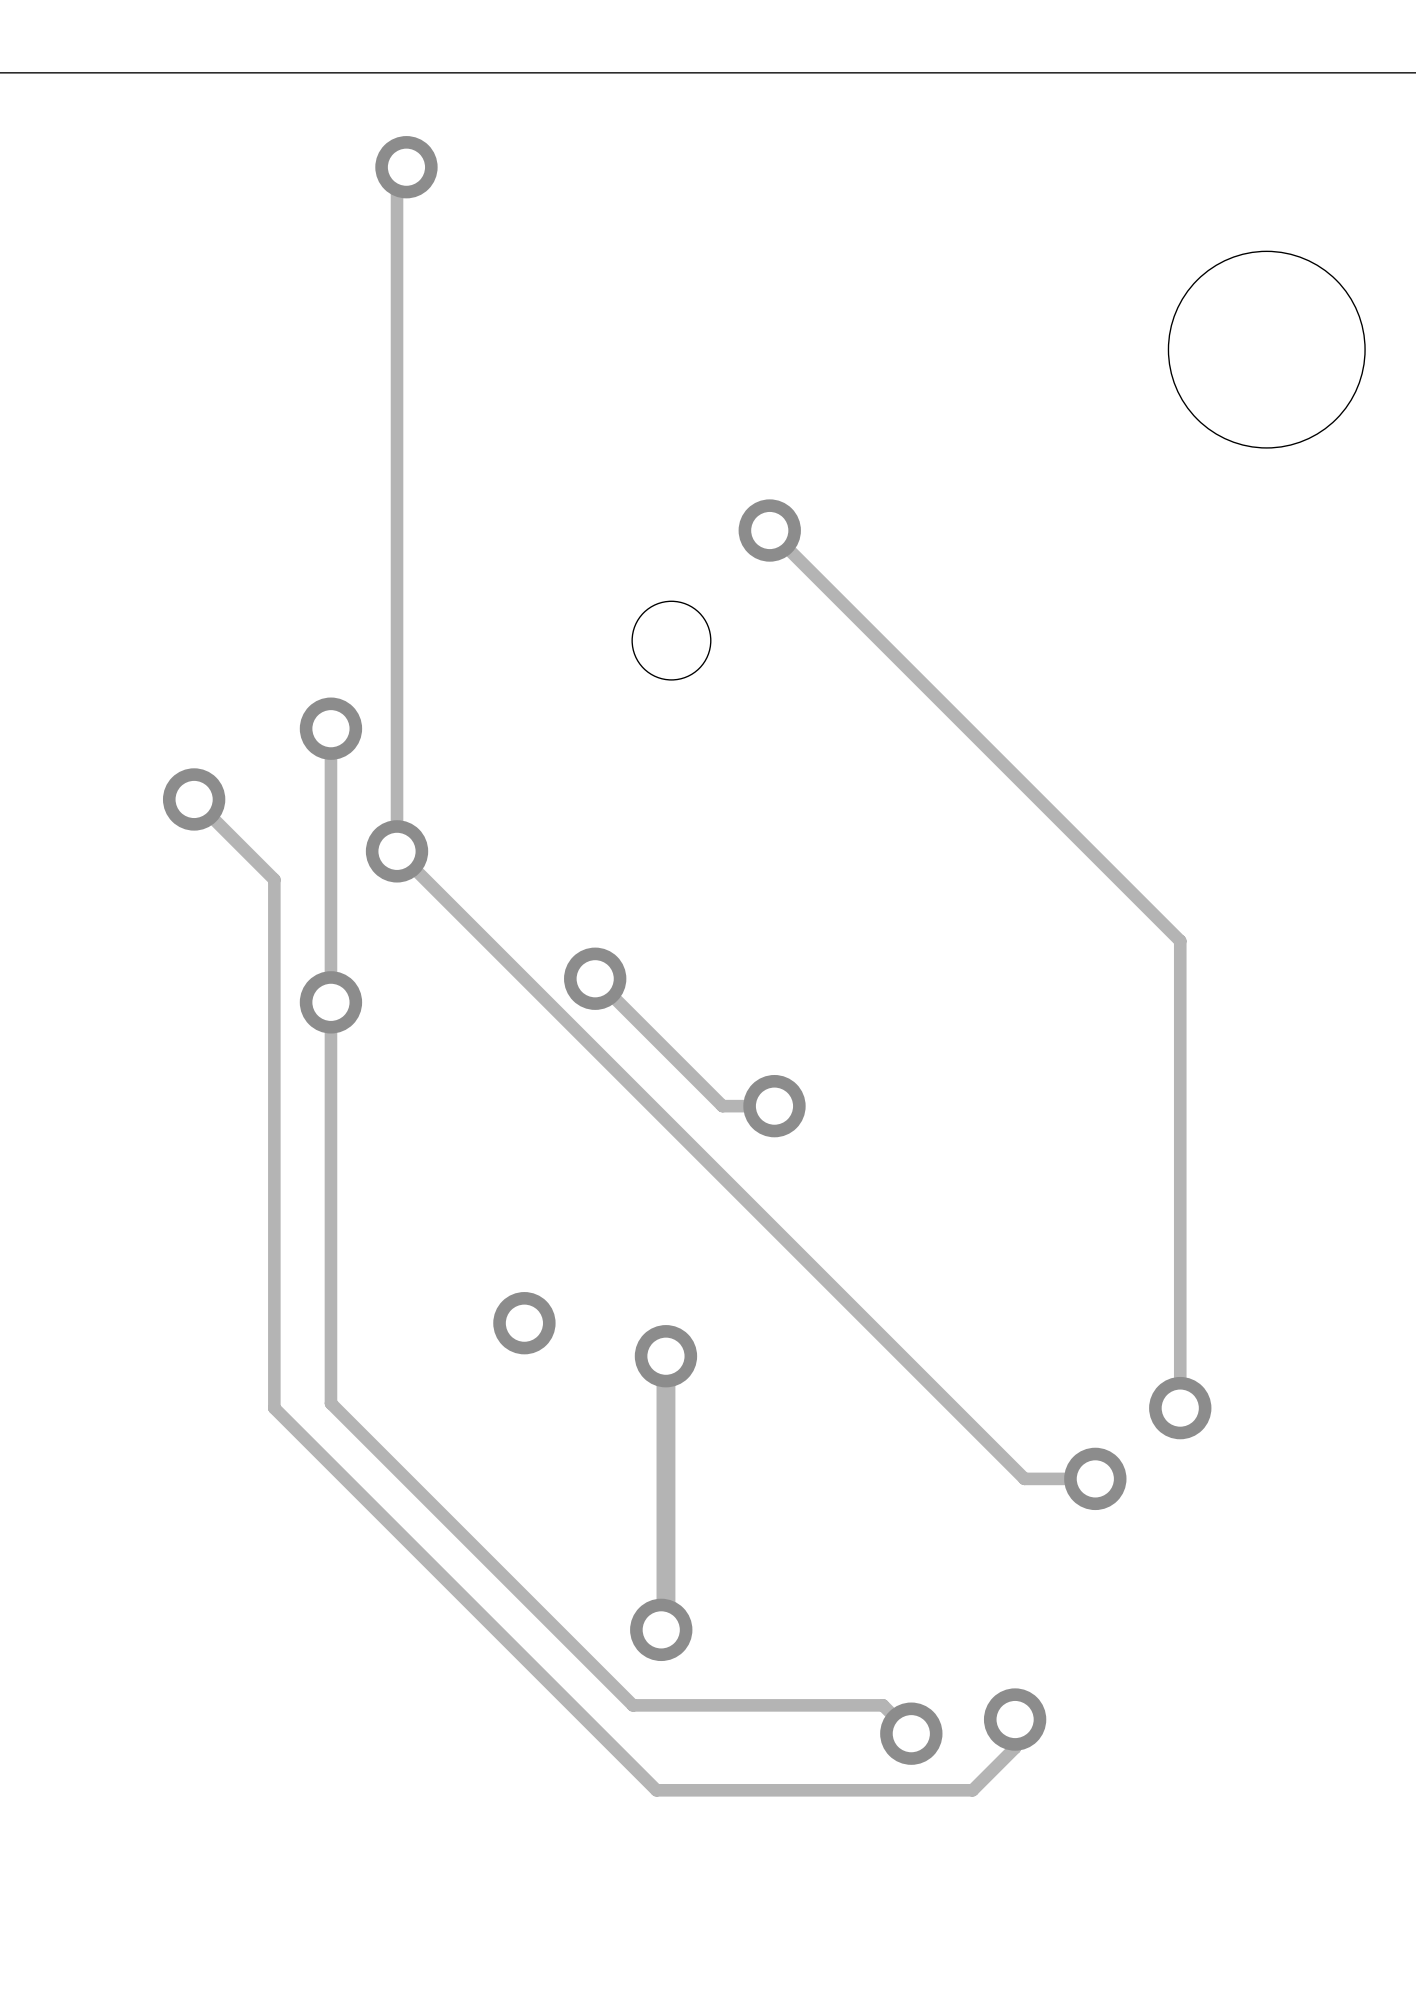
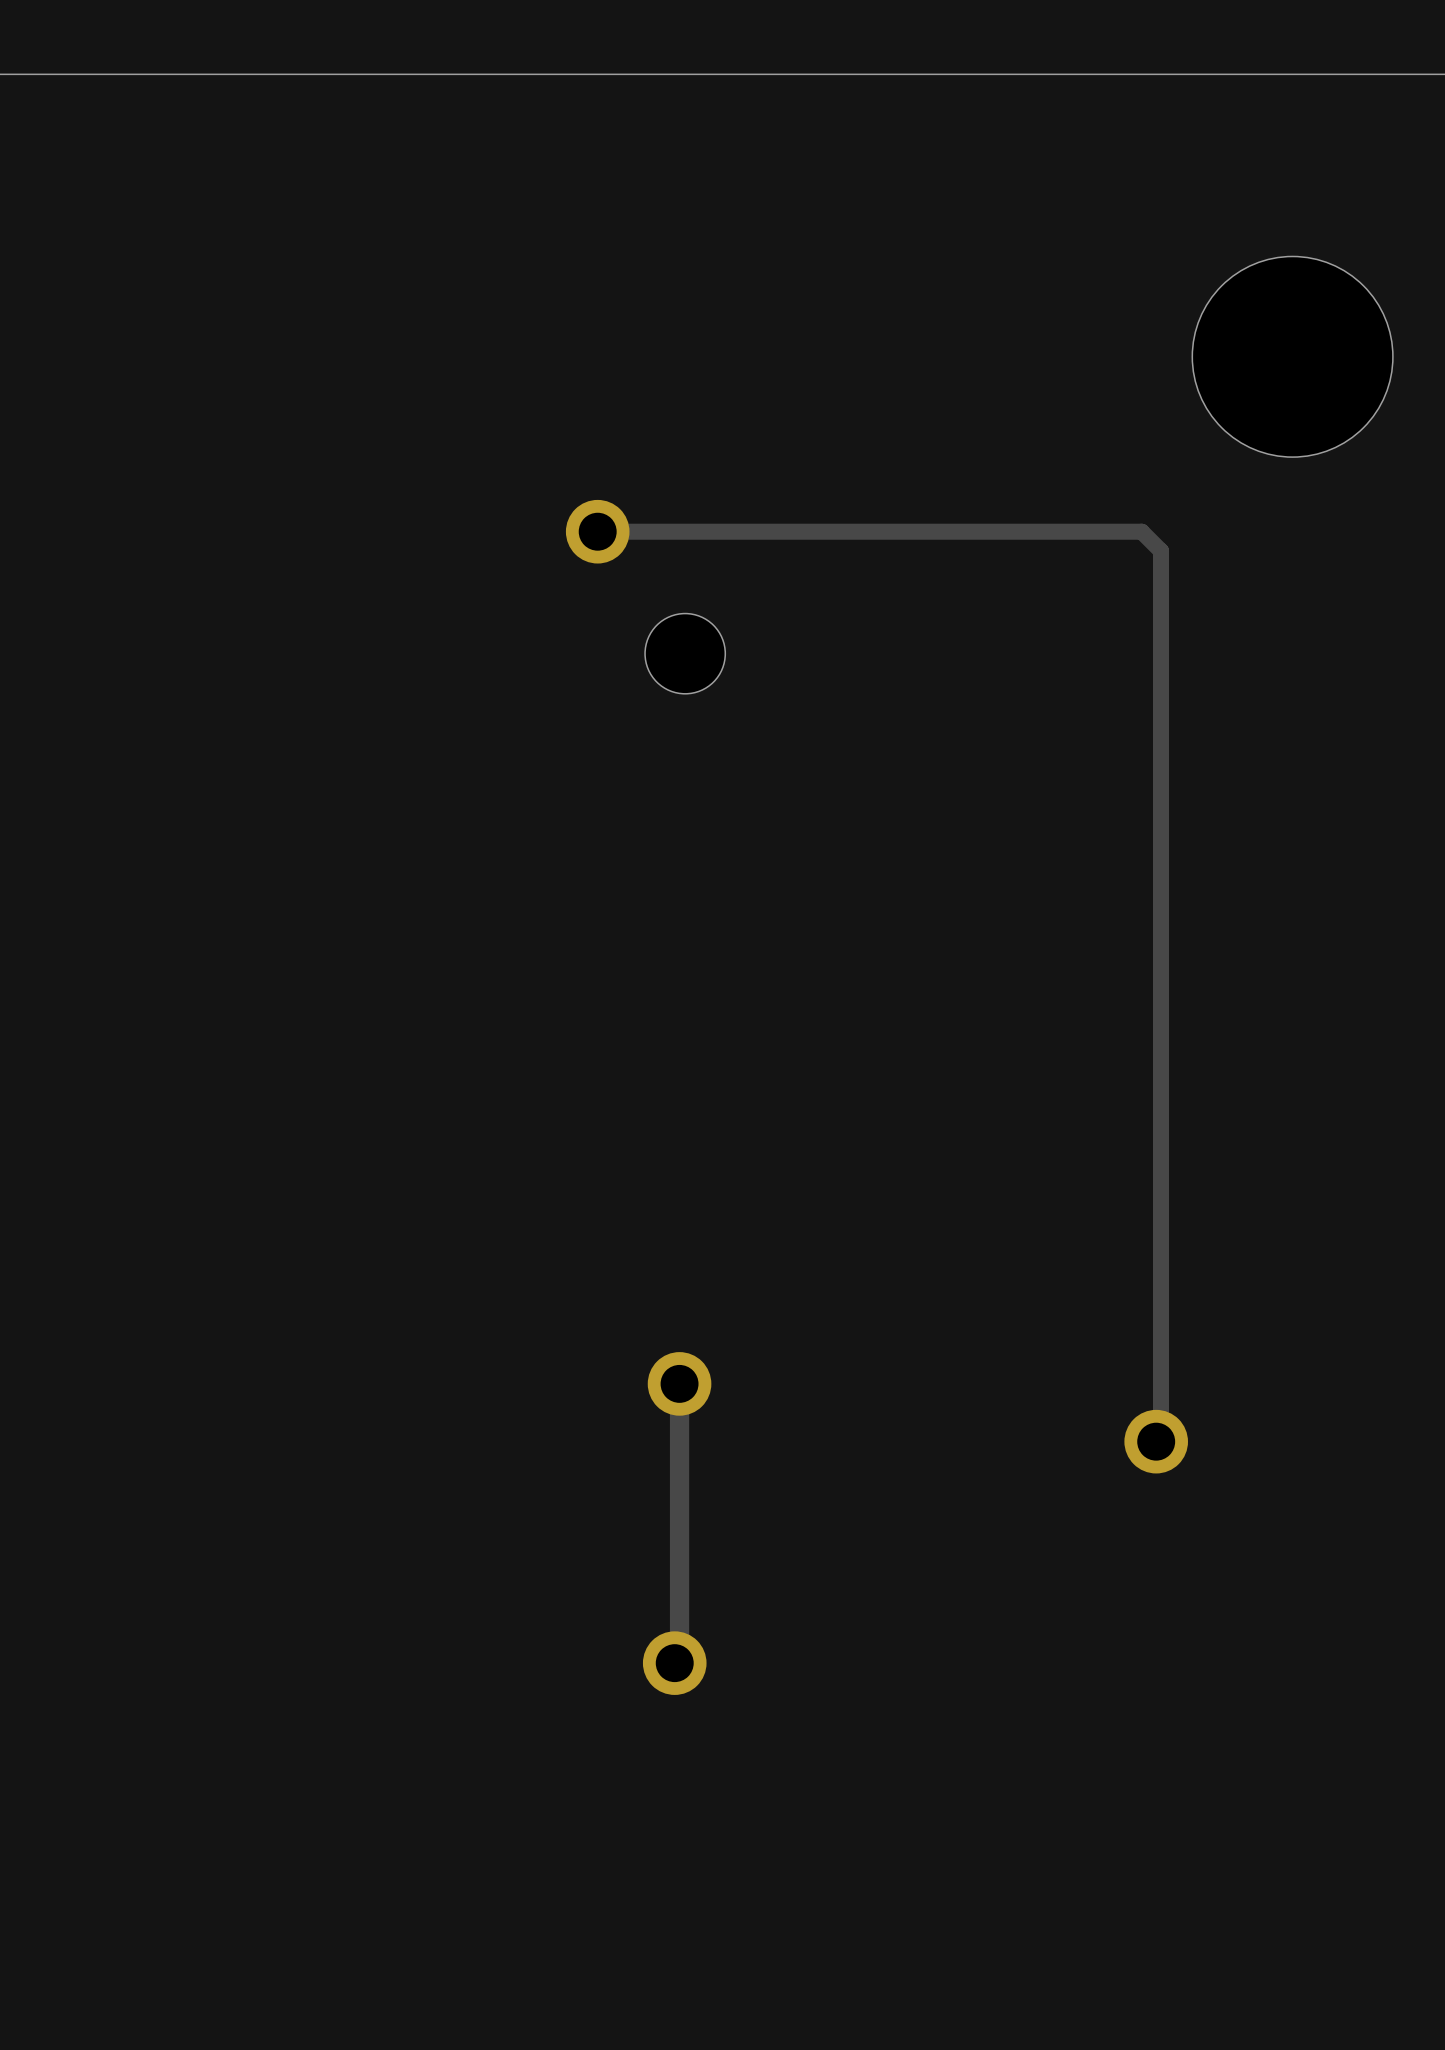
track: (406, 167) (397, 176) (397, 851) (1024, 1478) (1095, 1478) -> none
via: (406, 167) -> none
track: none -> (597, 531) (1141, 531) (1161, 550) (1161, 1436) (1156, 1441)
via: none -> (597, 531)
track: (769, 530) (1180, 941) (1180, 1408) -> none
via: (769, 530) -> none
track: (330, 728) (330, 1403) (632, 1705) (883, 1705) (911, 1733) -> none
via: (330, 728) -> none
track: (194, 799) (274, 879) (274, 1408) (656, 1790) (972, 1790) (1015, 1747) (1015, 1719) -> none
via: (194, 799) -> none
via: (397, 851) -> none
track: (595, 978) (722, 1106) (774, 1106) -> none
via: (595, 978) -> none
via: (330, 1002) -> none
via: (774, 1106) -> none
via: (524, 1323) -> none
via position: (1180, 1408) -> (1156, 1441)
via: (1095, 1478) -> none
via: (1015, 1719) -> none
via: (911, 1733) -> none

